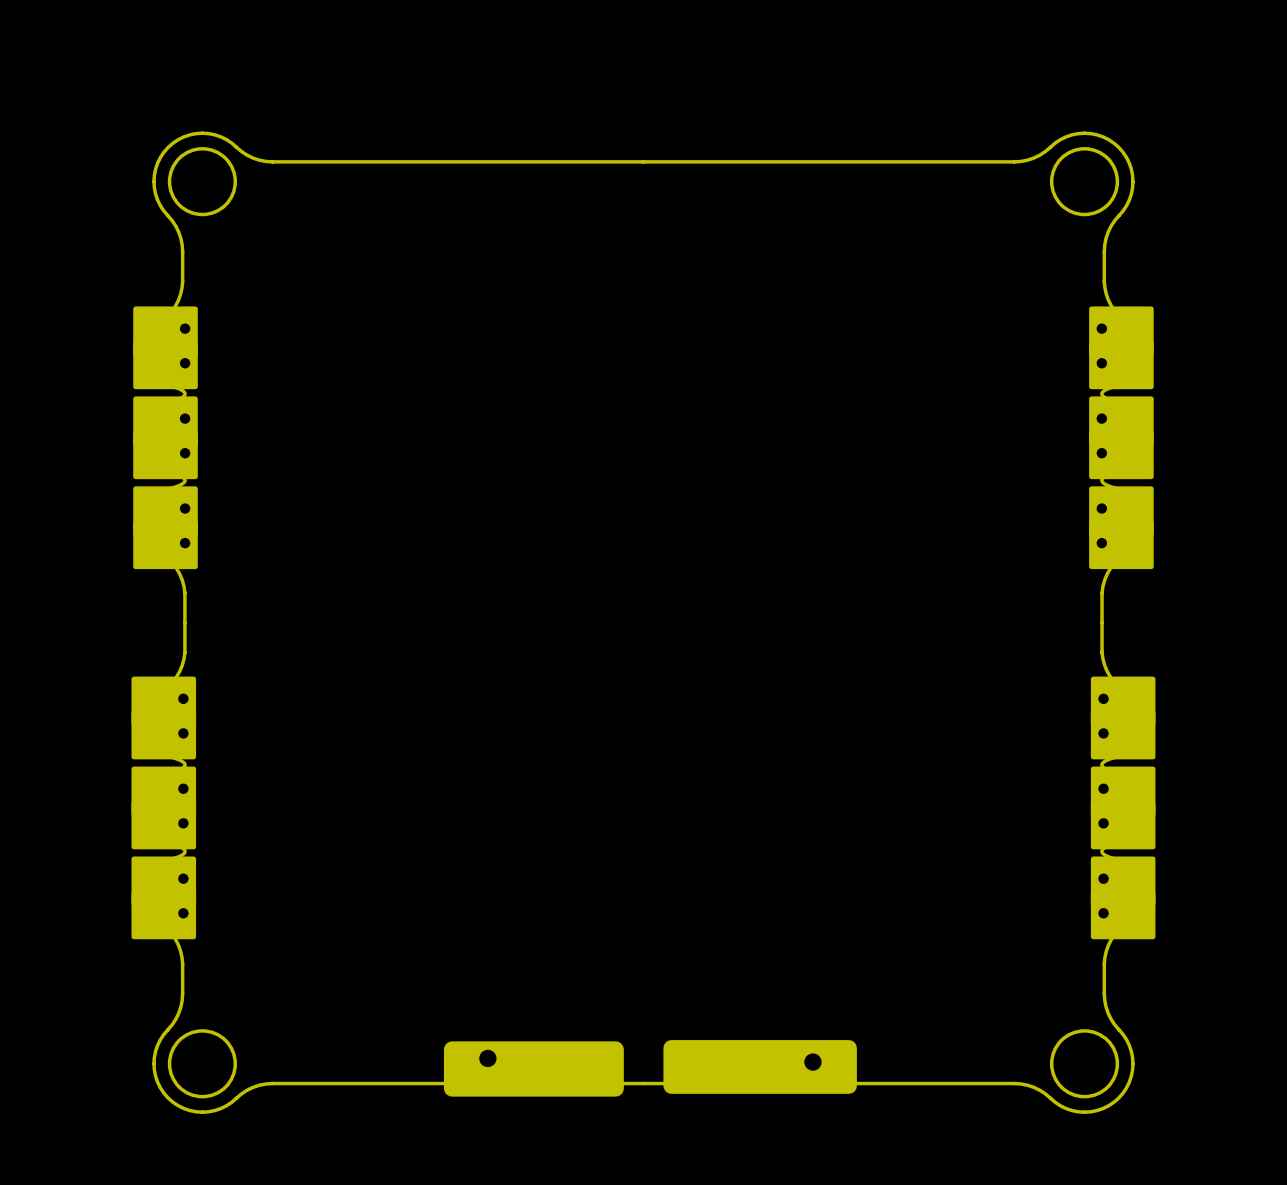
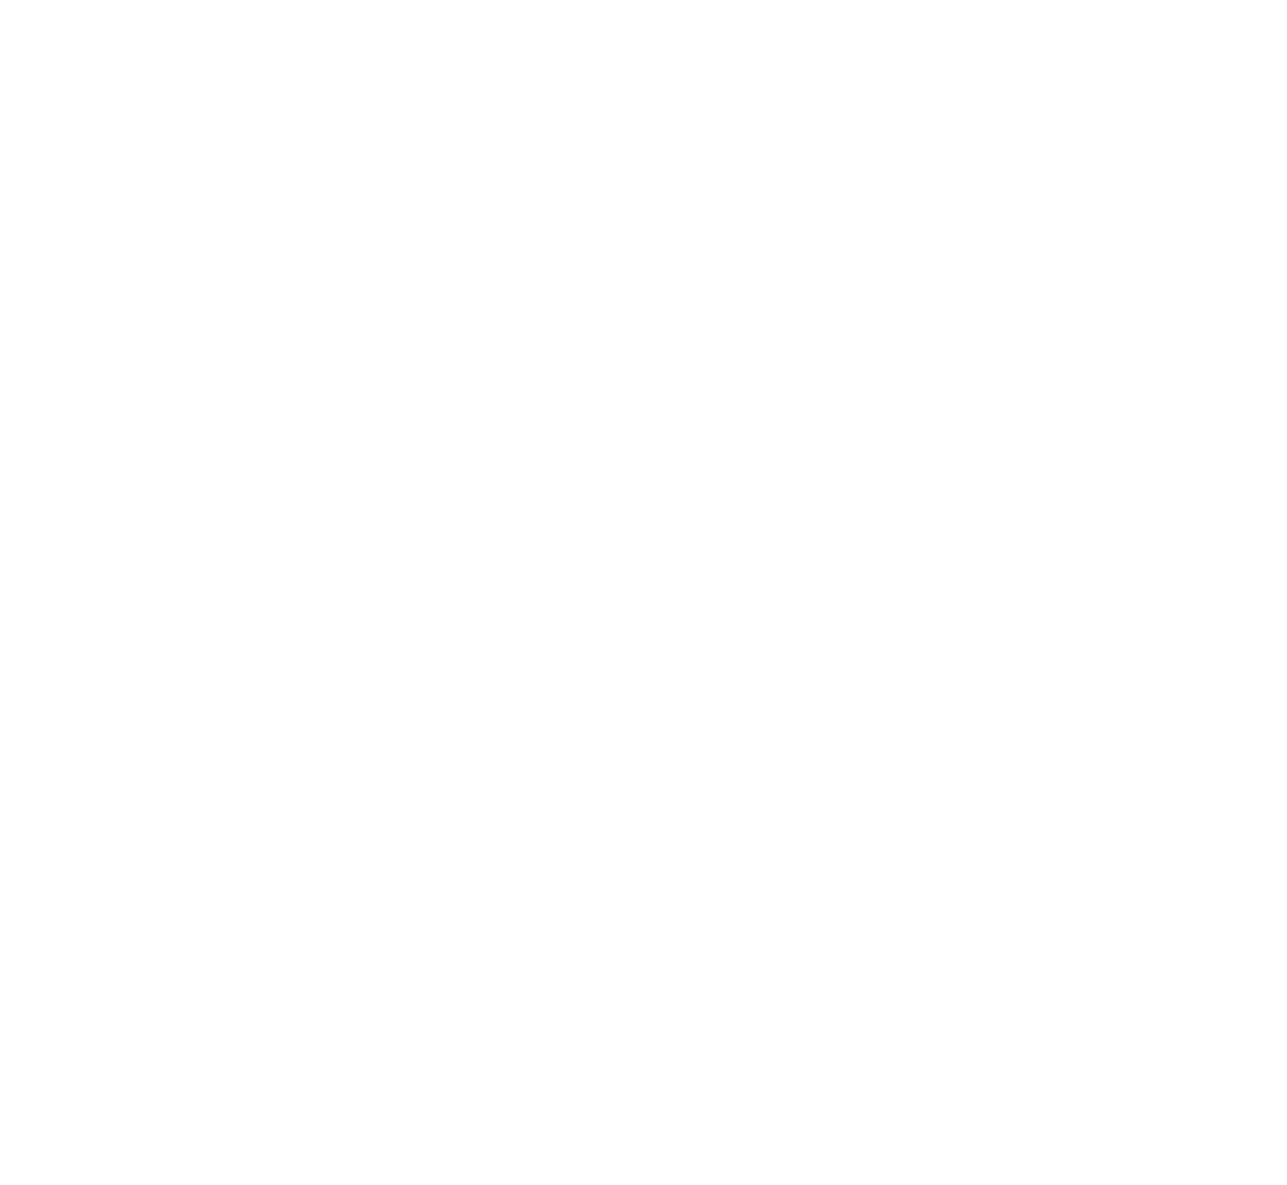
part: (643, 622) -> none

